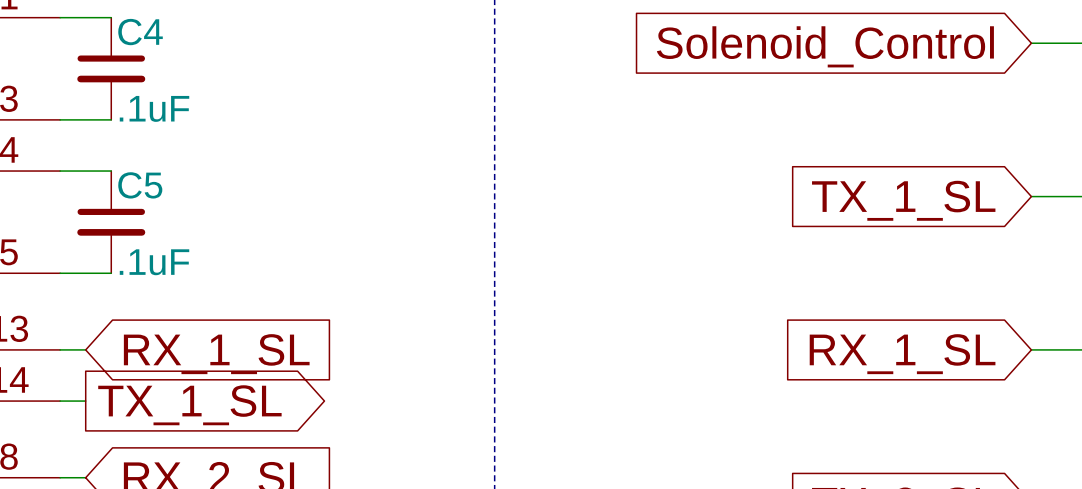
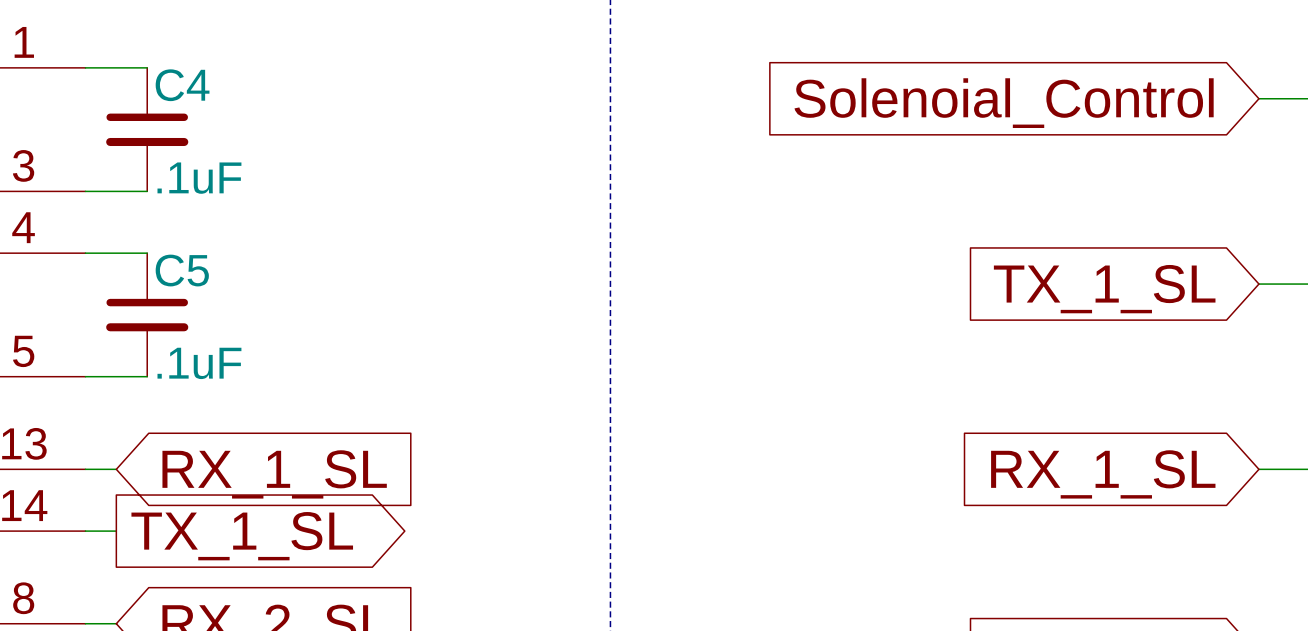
global label: Solenoid_Control (825, 46) -> Solenoial_Control (1004, 103)

